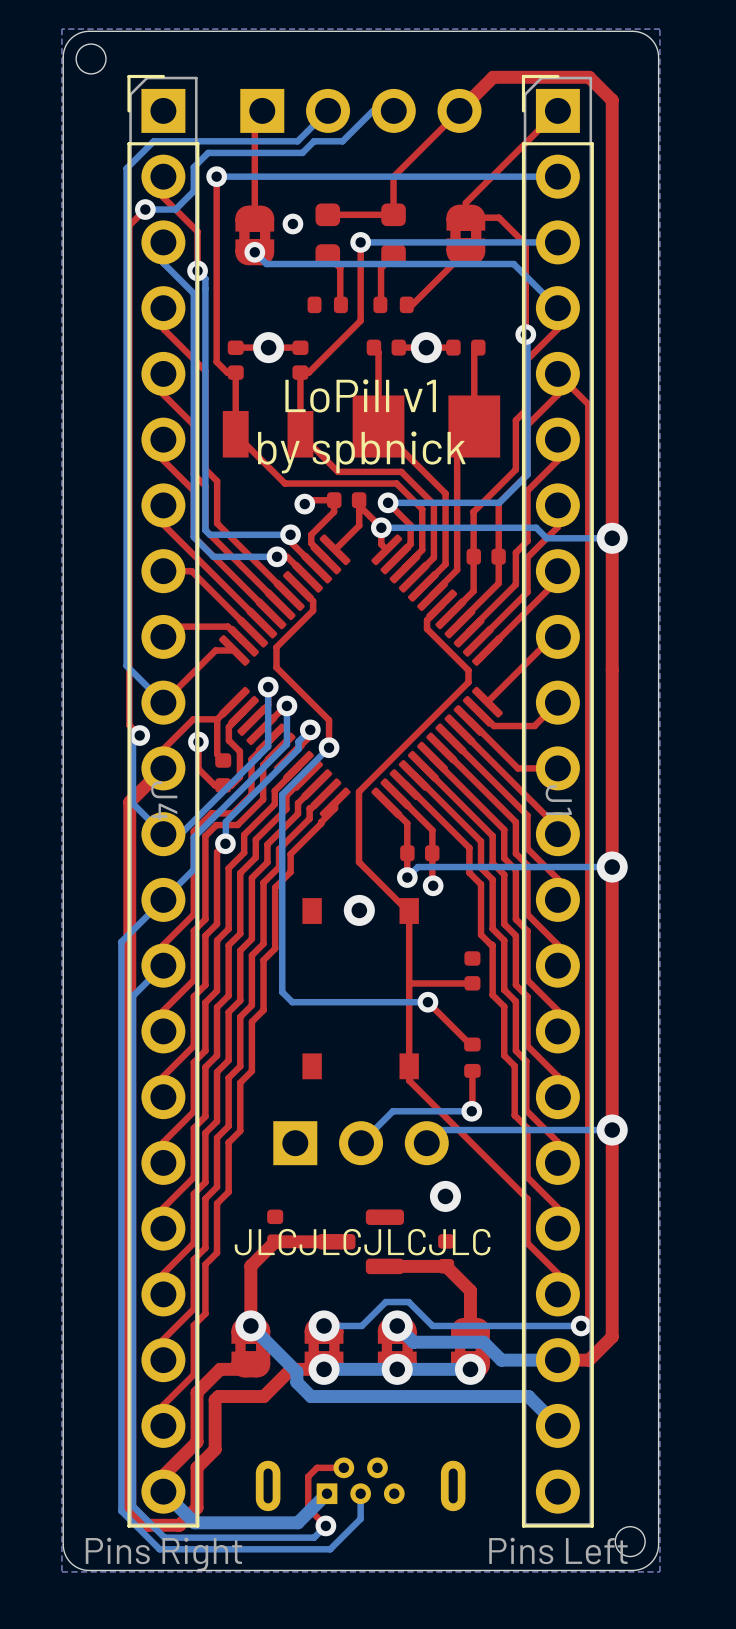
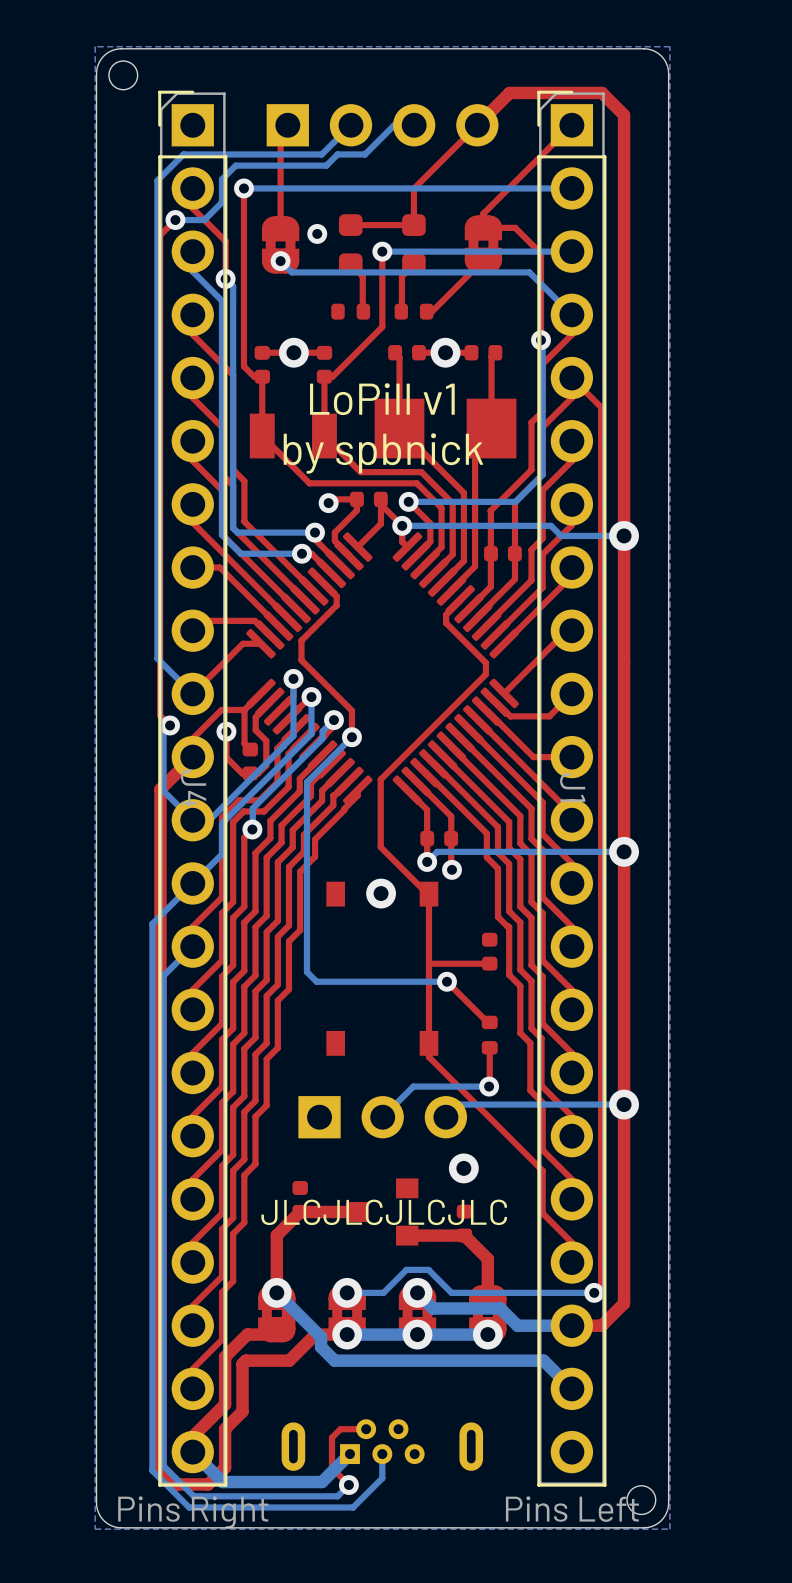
part footprint: [317, 1209, 405, 1275] -> [346, 1178, 419, 1246]

